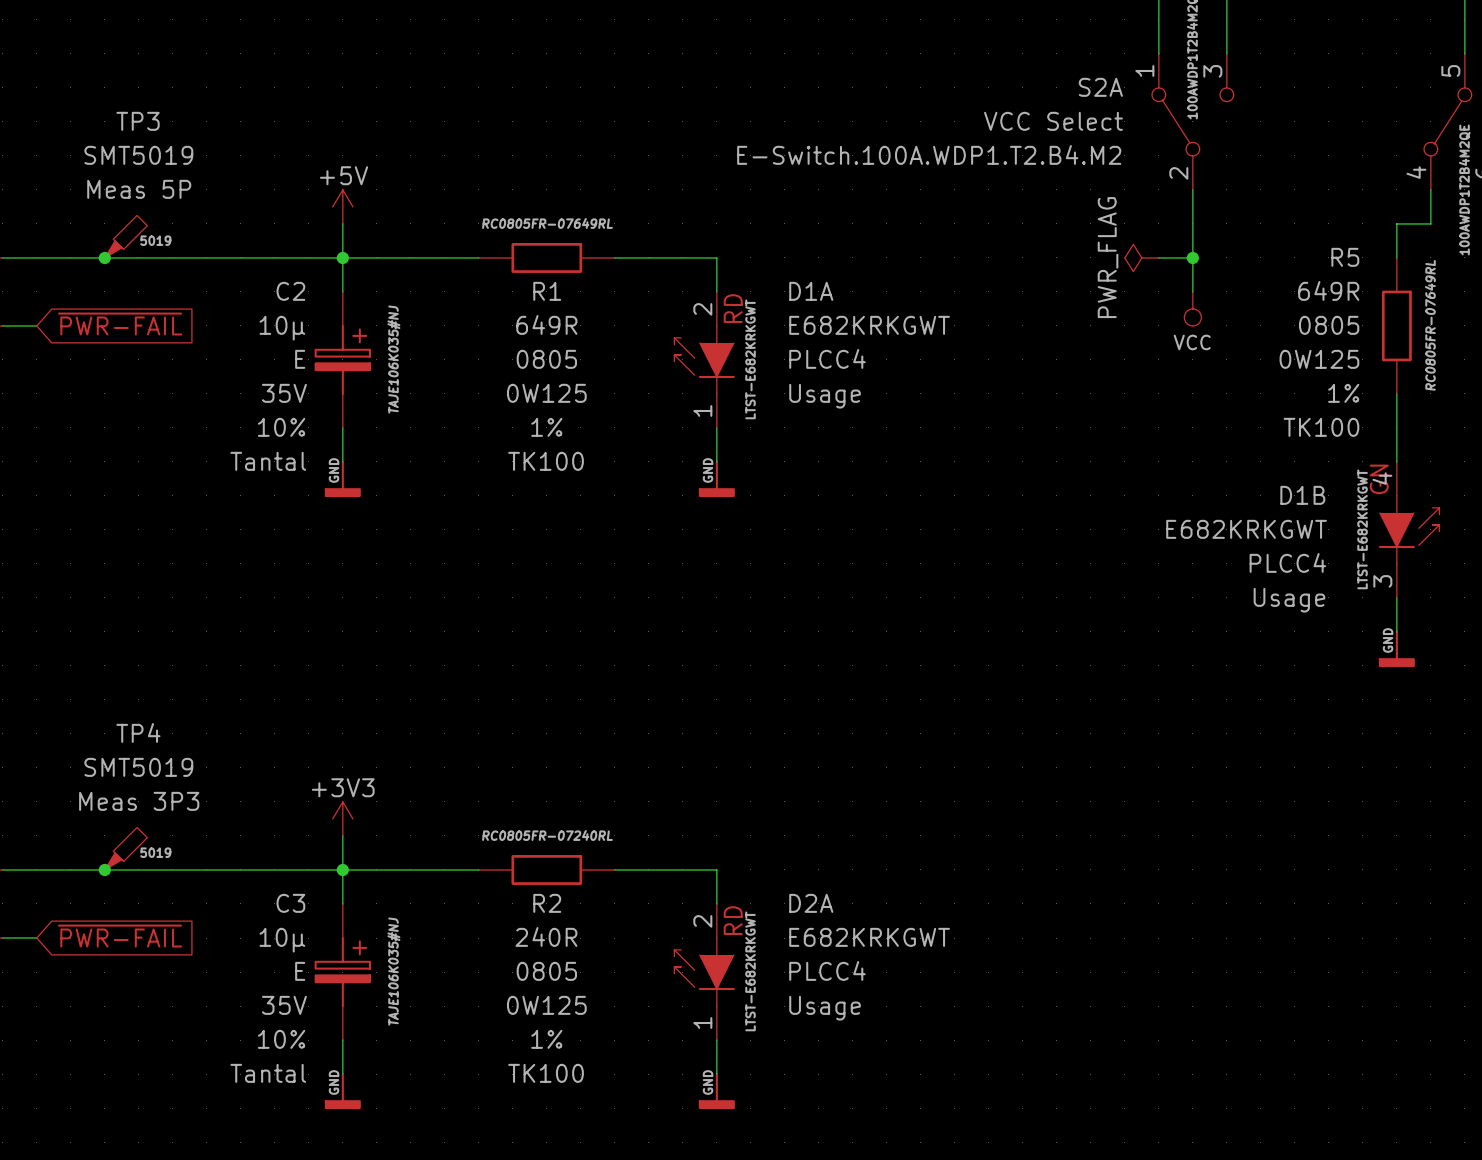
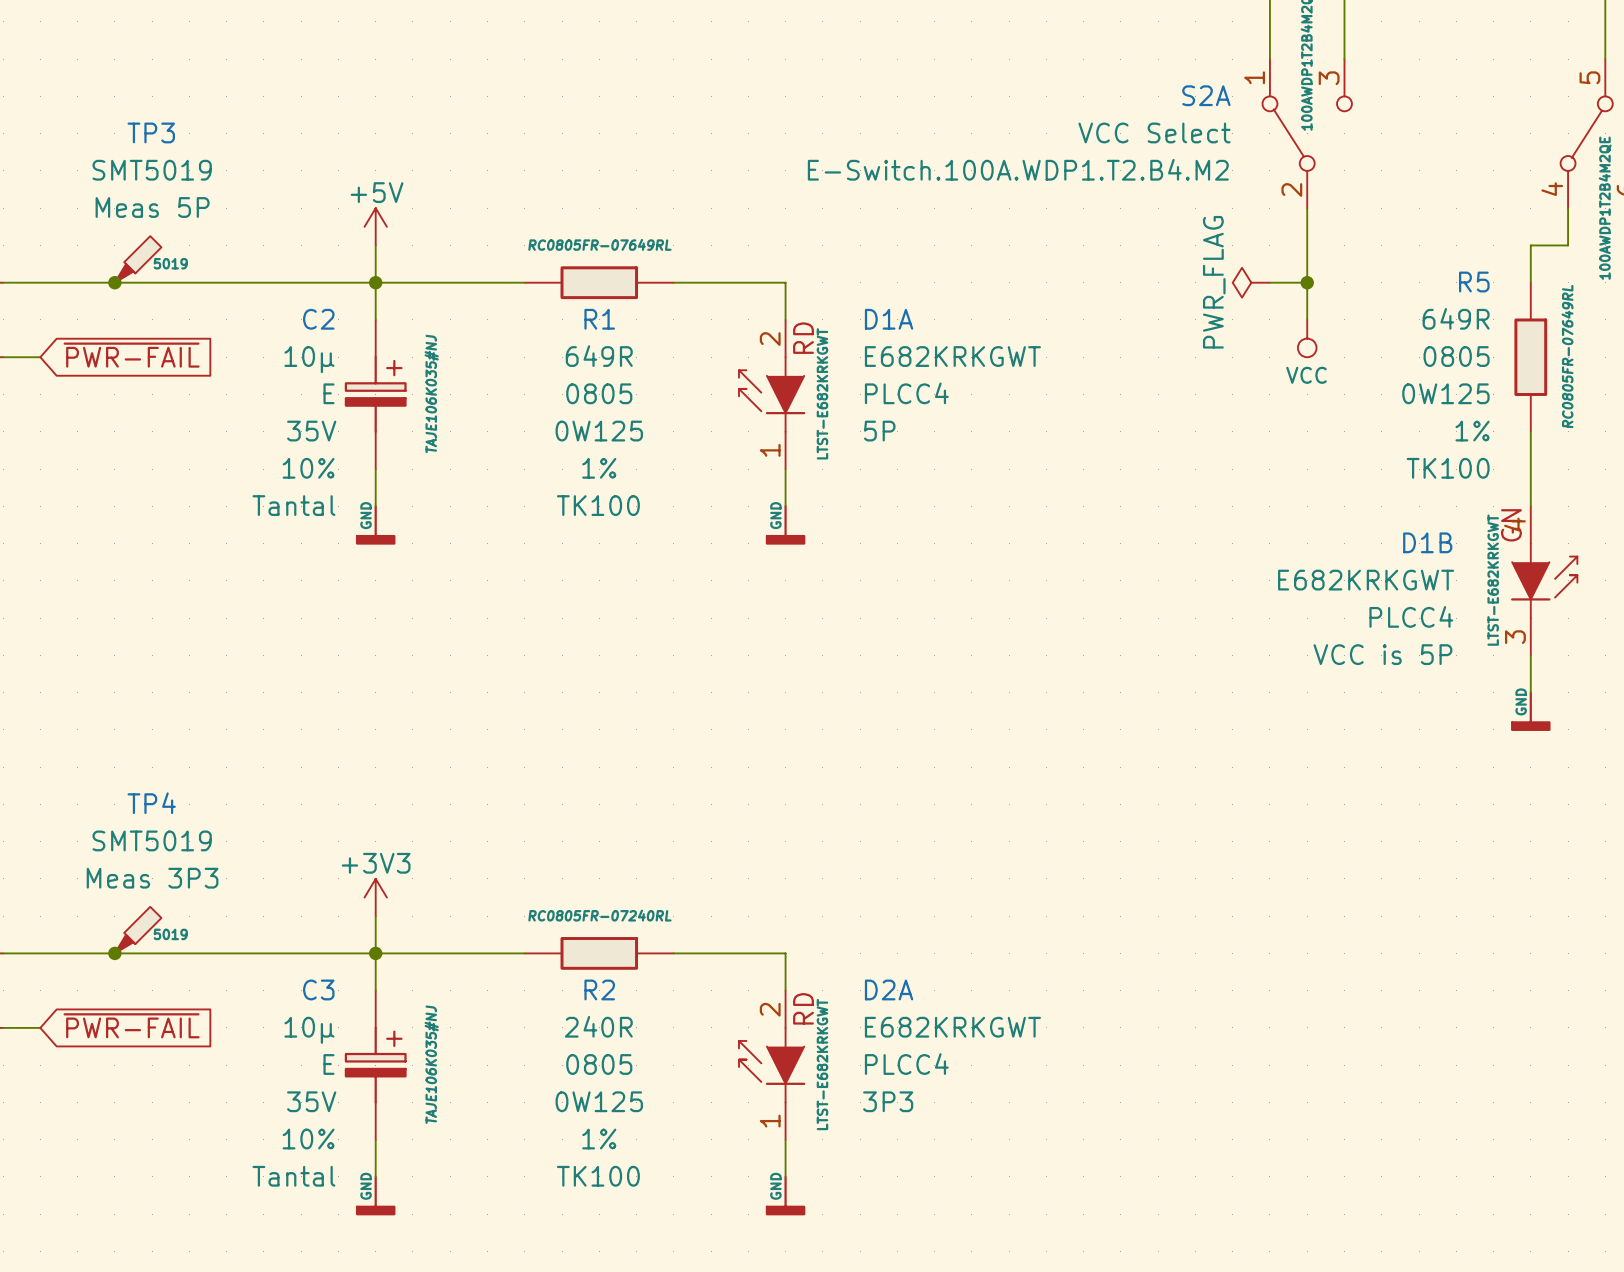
D1A text: Usage (825, 396) -> 5P (879, 431)
D1B text: Usage (1289, 600) -> VCC is 5P (1382, 654)
D2A text: Usage (825, 1008) -> 3P3 (888, 1101)

